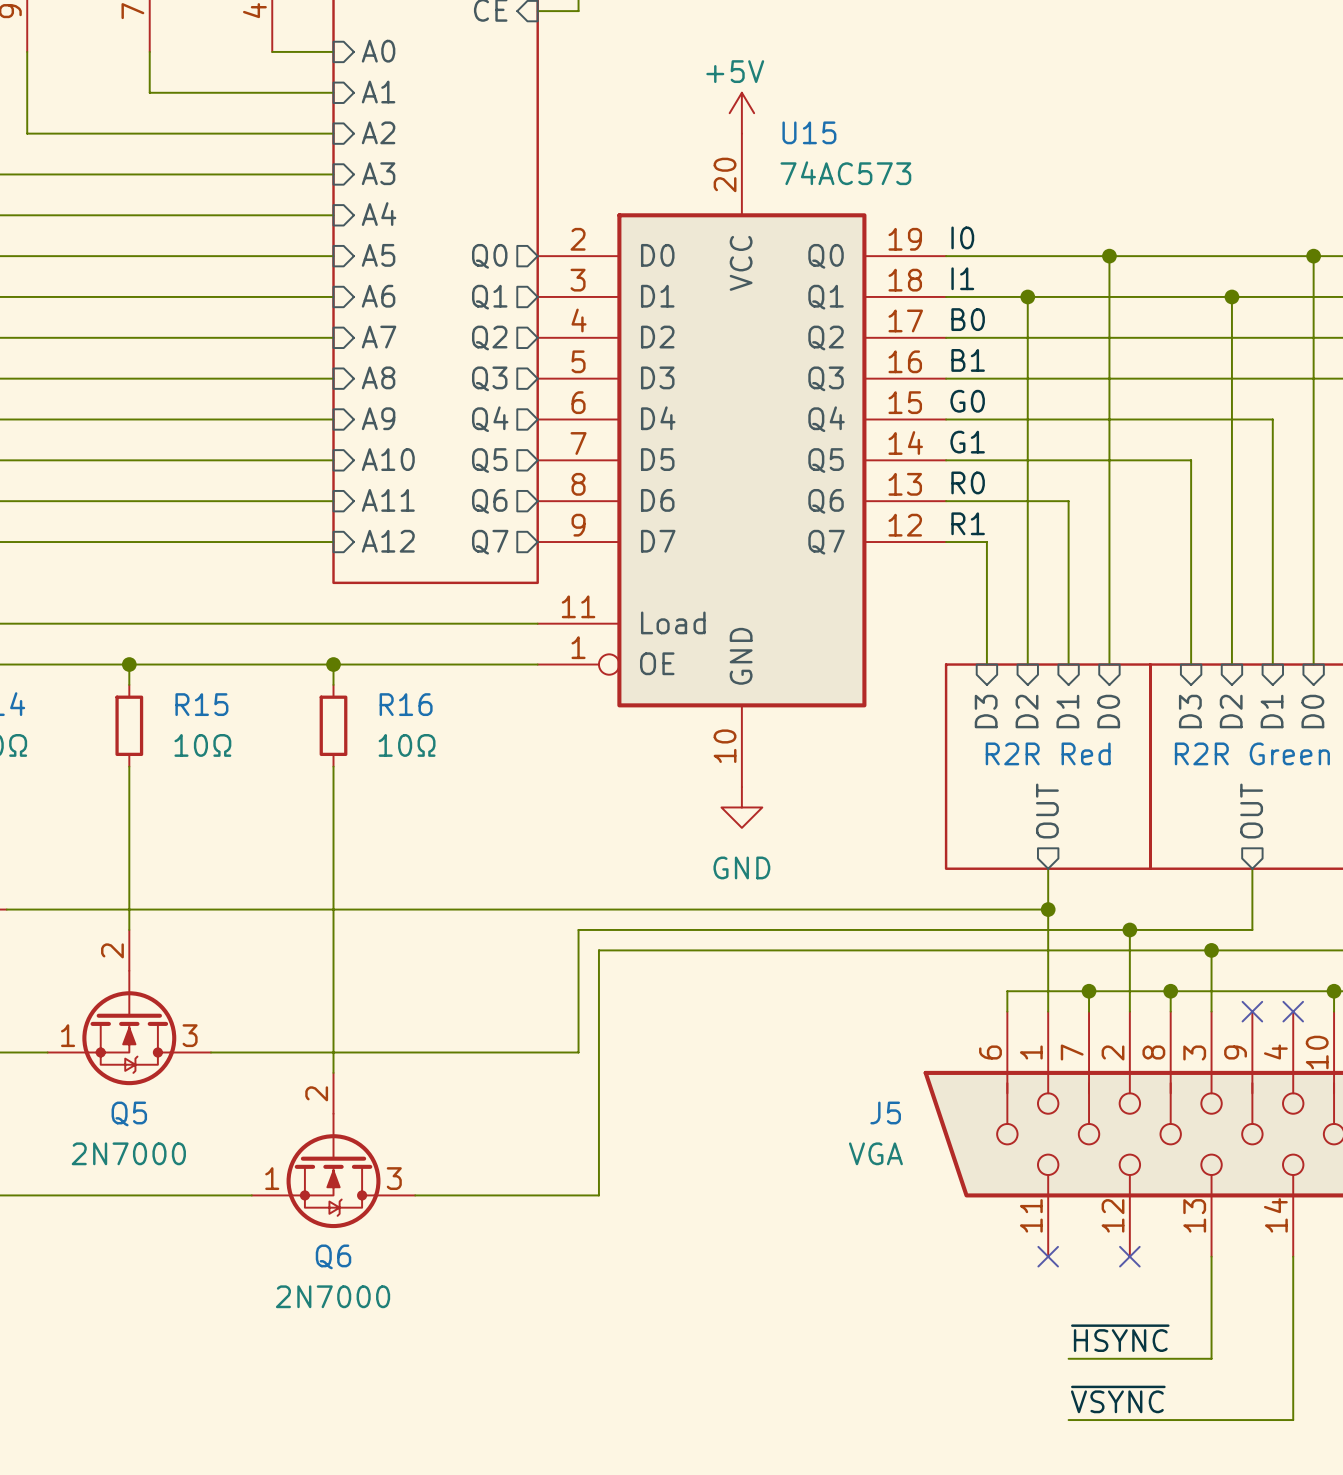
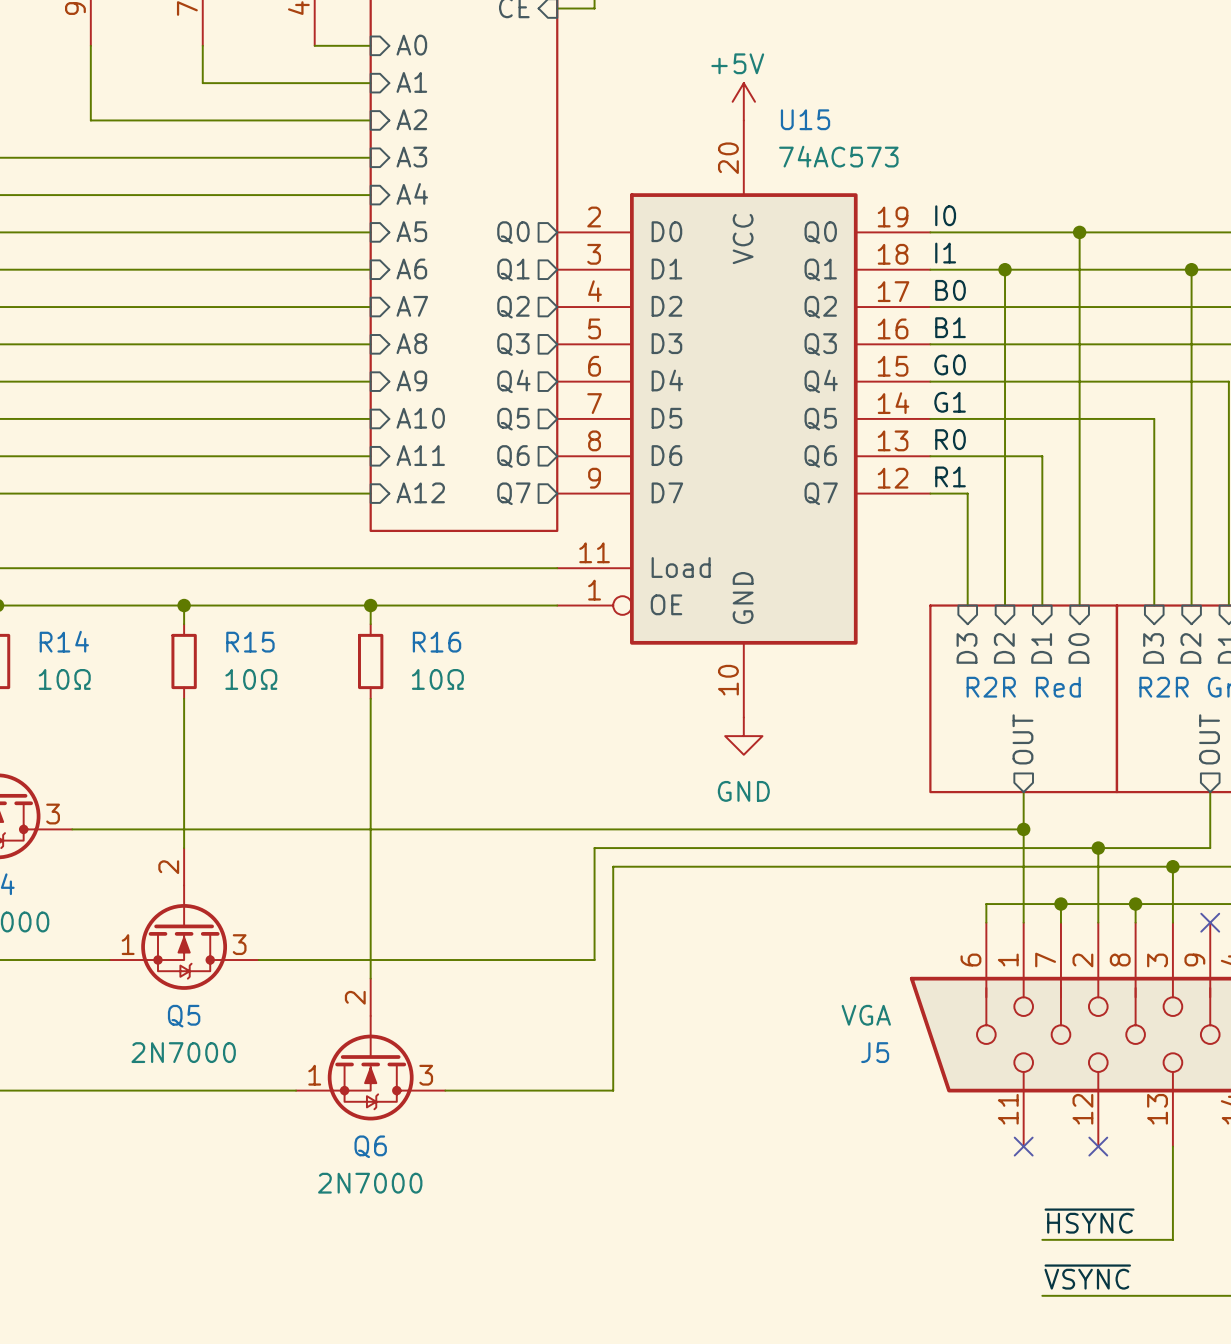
J5 name position: J5 (885, 1112) -> J5 (875, 1052)
J5 value position: VGA (875, 1153) -> VGA (866, 1015)

